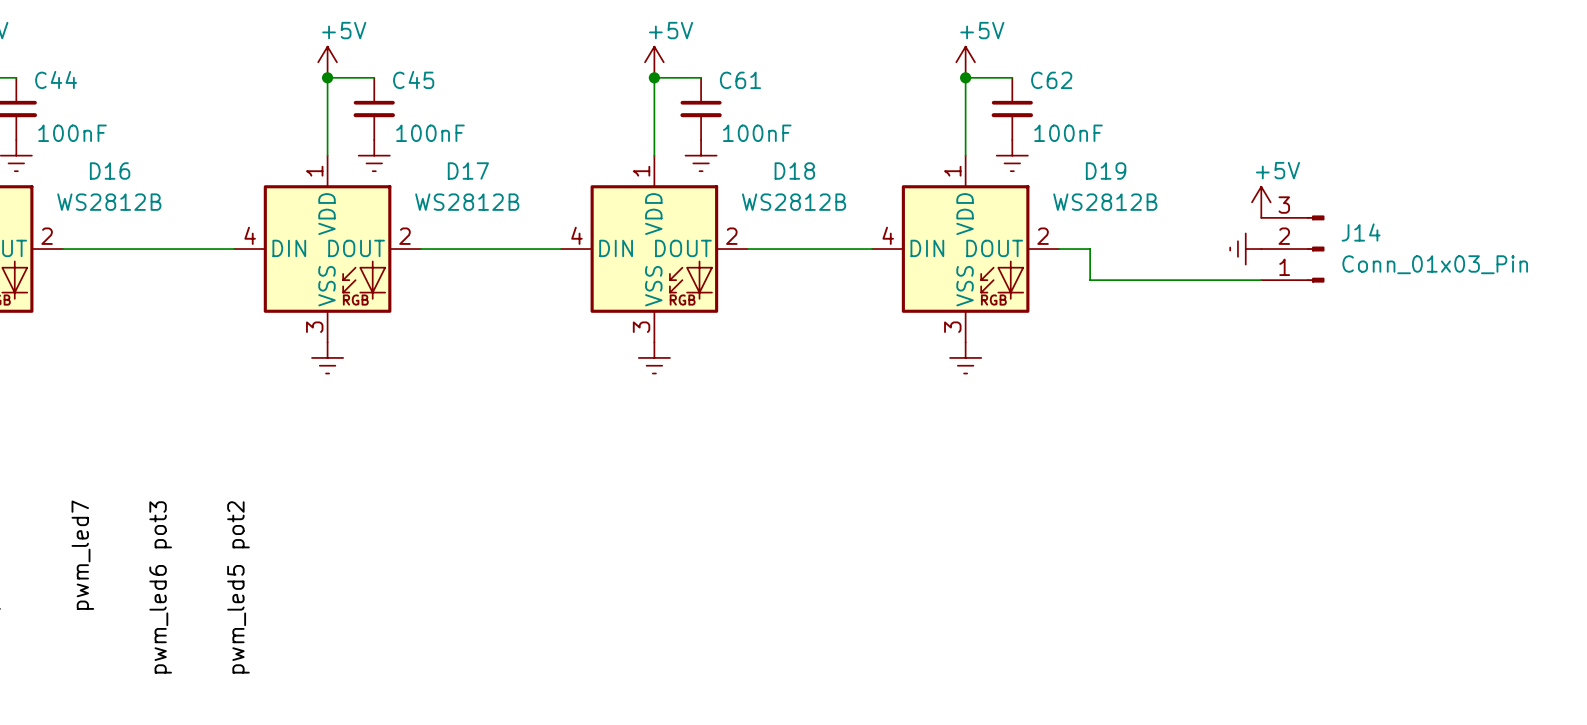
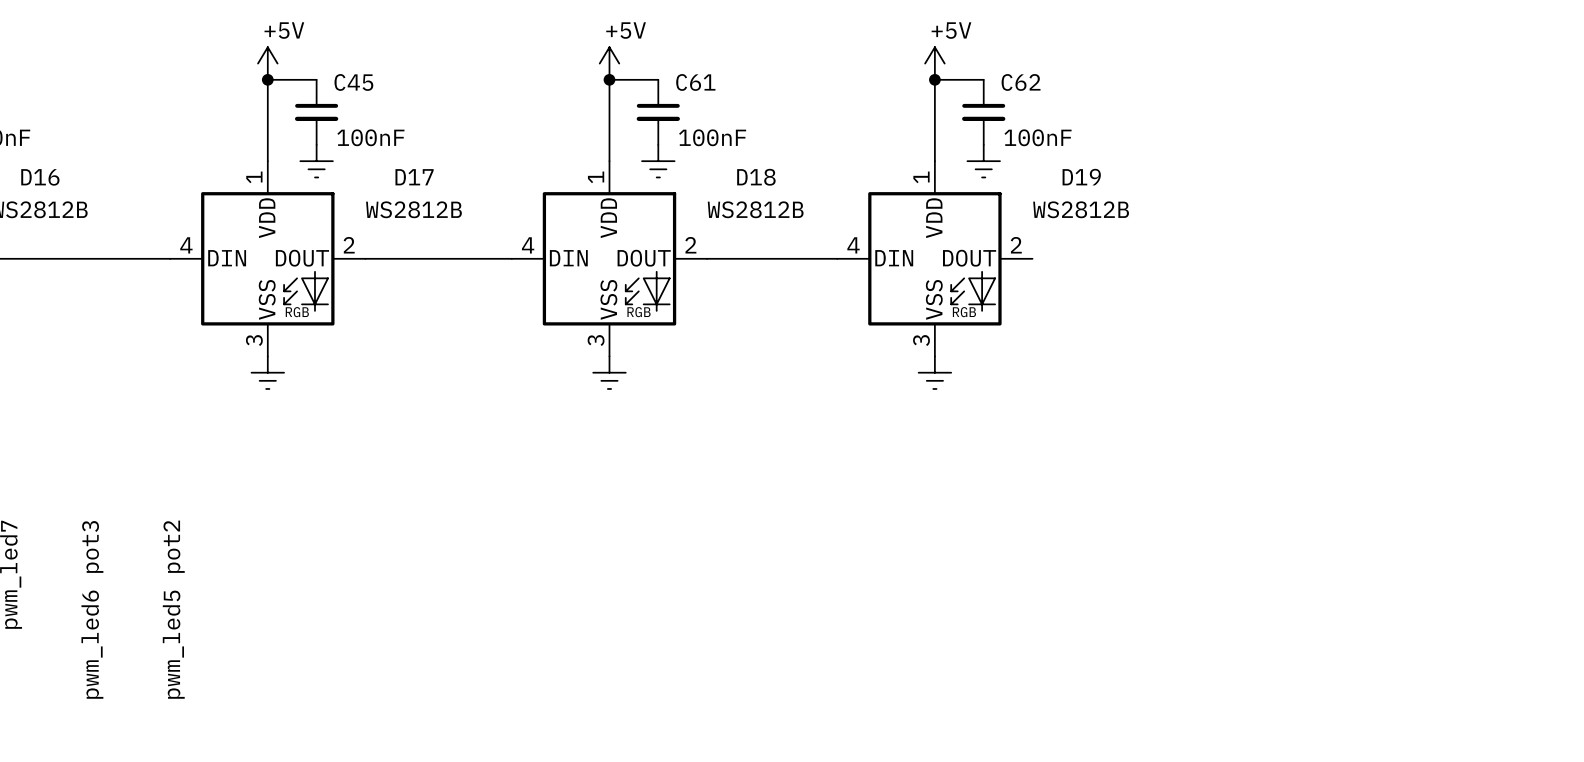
power symbol: +5V (1261, 202) -> none
wire: (1059, 249) (1090, 249) (1090, 280) (1261, 280) -> none
power symbol: (1245, 249) -> none
J14: Conn_01x03_Pin (1292, 249) -> none

